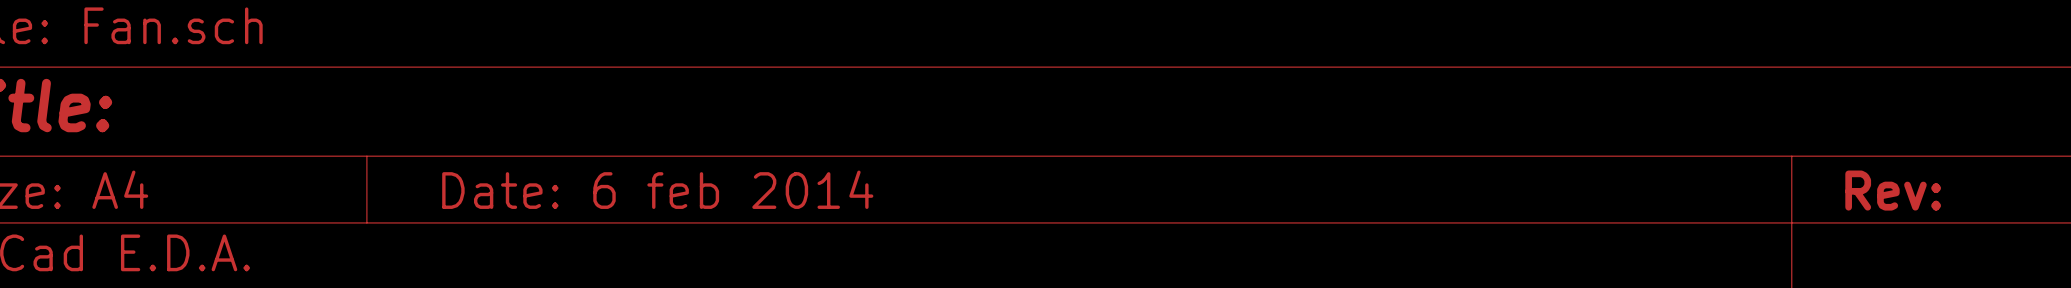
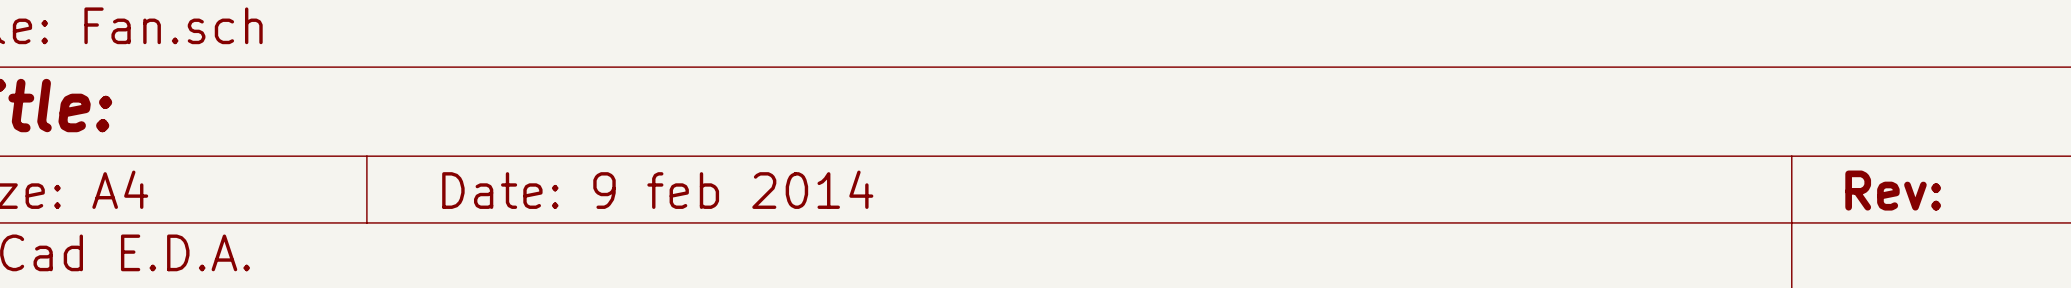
title block: Date: 6 feb 2014 (657, 189) -> Date: 9 feb 2014 (657, 189)

